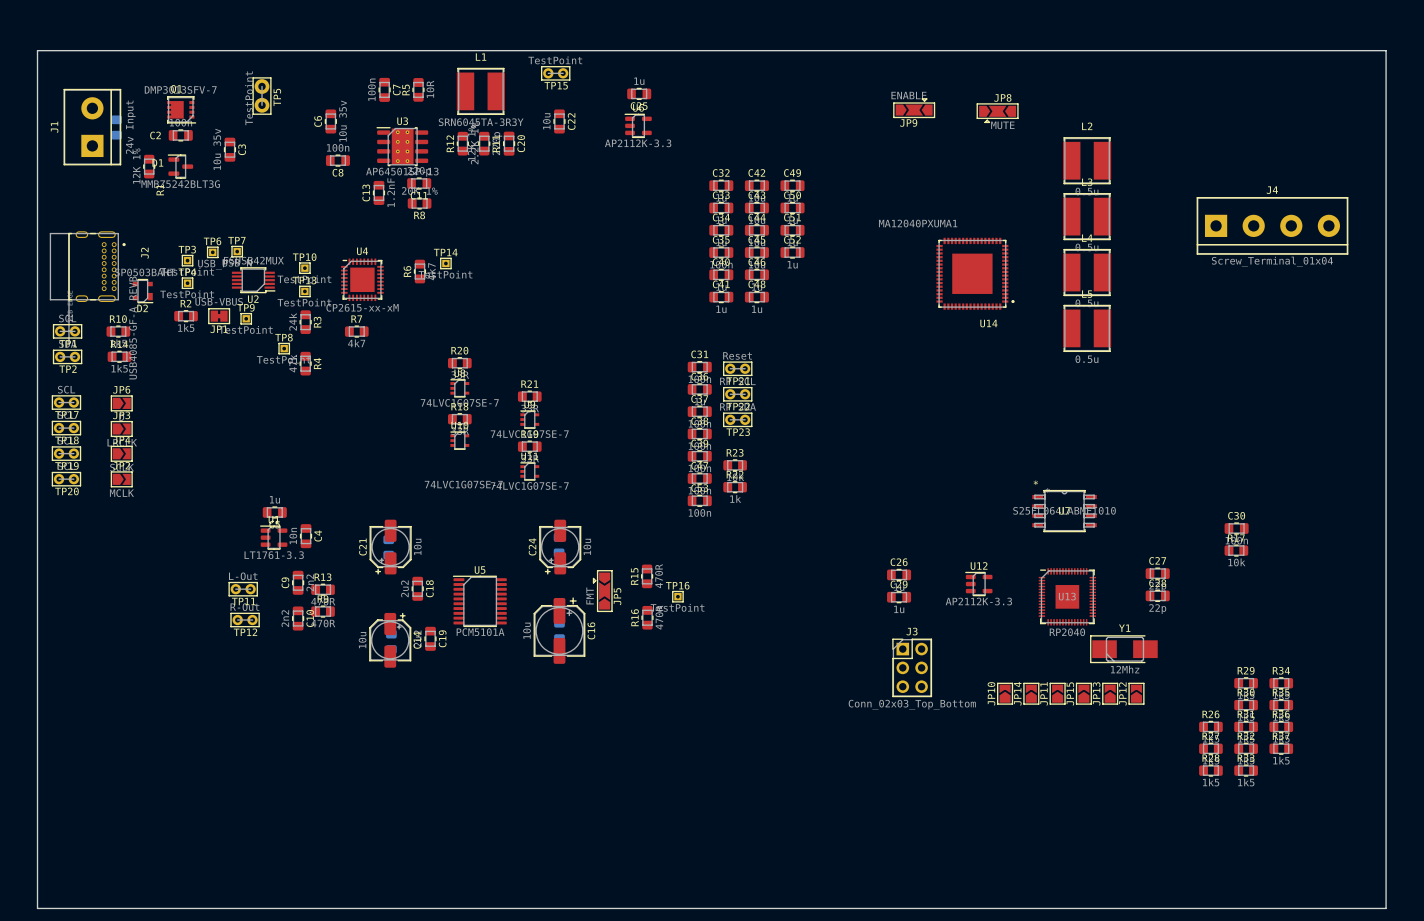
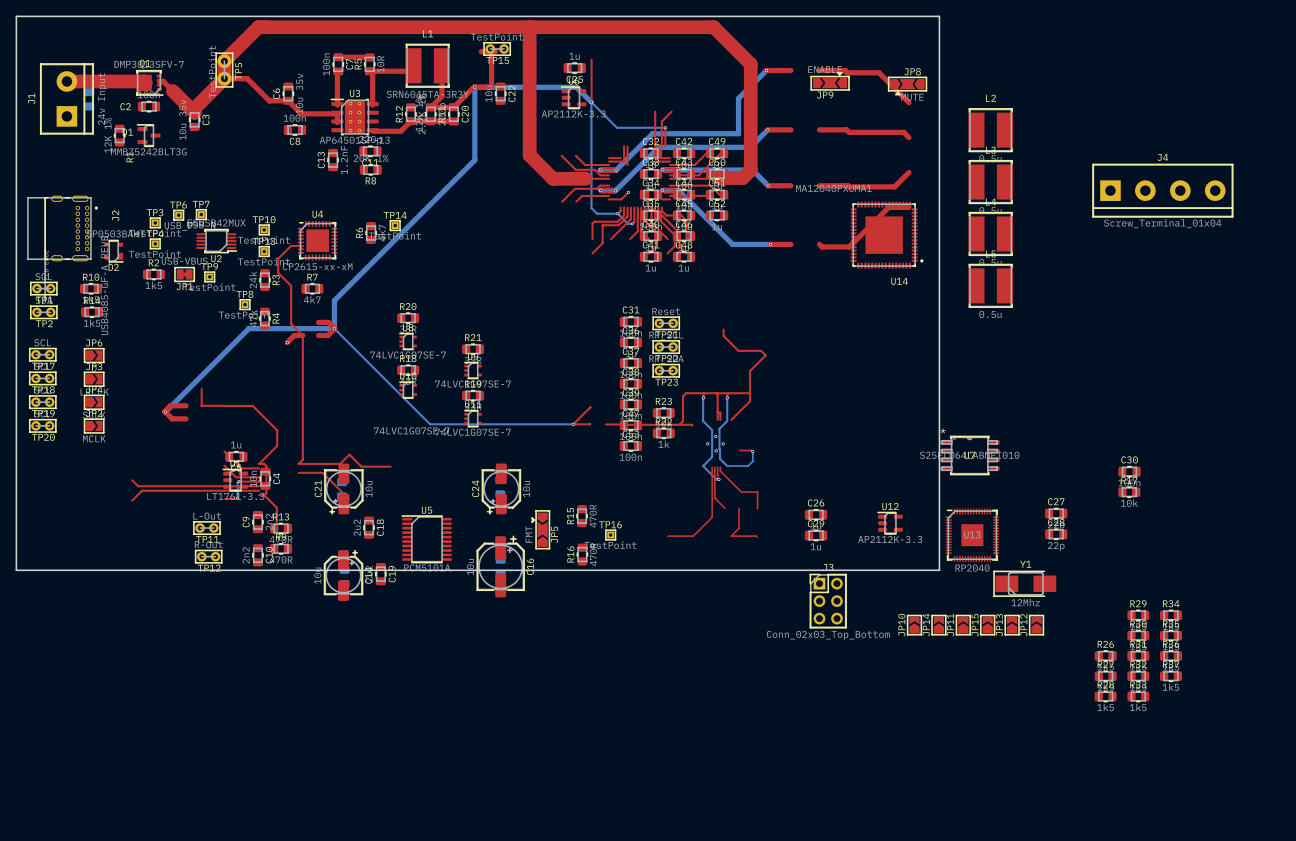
board edge: none -> (16, 16) (939, 16) (939, 570) (16, 570) (16, 16)
top track: none -> (529, 27) (529, 155) (553, 178) (585, 178)
board edge: (37, 50) (1386, 50) (1386, 908) (37, 908) (37, 50) -> none
top track: none -> (481, 51) (494, 51) (491, 55) (491, 87) (473, 87) (453, 107) (430, 107) (441, 96) (441, 65)
top track: none -> (338, 57) (369, 57)
top track: none -> (591, 59) (591, 102)
top track: none -> (413, 65) (407, 71) (369, 71) (372, 74) (372, 105)
top track: none -> (766, 70) (790, 70)
bottom track: none -> (766, 70) (738, 98) (738, 133) (652, 133) (615, 170) (600, 170)
via: none -> (766, 70)
top track: none -> (819, 70) (879, 72) (908, 102)
top track: none -> (338, 71) (337, 105)
top track: none -> (224, 78) (247, 78) (269, 100)
top track: none -> (224, 78) (194, 108) (194, 112) (163, 81) (159, 81)
top track: none -> (224, 78) (224, 61) (258, 27) (713, 27) (750, 64) (750, 170) (742, 178) (718, 178)
top track: none -> (66, 81) (145, 82)
via: none -> (474, 87)
top track: none -> (269, 100) (288, 100) (301, 113) (337, 113) (337, 122)
bottom track: none -> (591, 102) (576, 87) (474, 87) (474, 160) (334, 300) (334, 328)
bottom track: none -> (591, 102) (616, 127) (665, 127)
bottom track: none -> (591, 102) (591, 208) (597, 213) (617, 213) (627, 223) (632, 223)
via: none -> (591, 102)
top track: none -> (655, 111) (655, 146)
top track: none -> (671, 111) (661, 121) (661, 146)
top track: none -> (453, 121) (410, 121) (400, 131) (372, 131)
top track: none -> (665, 127) (665, 146)
via: none -> (665, 127)
top track: none -> (767, 129) (790, 129)
bottom track: none -> (767, 129) (750, 147) (658, 147) (615, 190) (600, 190)
via: none -> (767, 129)
top track: none -> (819, 129) (846, 129) (849, 132) (903, 132) (908, 137)
top track: none -> (624, 146) (624, 161) (609, 161)
top track: none -> (627, 146) (627, 165)
top track: none -> (658, 146) (658, 158) (670, 158)
top track: none -> (707, 152) (694, 165) (670, 165)
top track: none -> (721, 152) (698, 175) (670, 175)
top track: none -> (561, 155) (575, 169) (594, 169) (600, 175) (609, 175)
top track: none -> (575, 155) (585, 165) (609, 165)
top track: none -> (609, 158) (620, 158)
top track: none -> (655, 161) (670, 161)
via: none -> (654, 163)
top track: none -> (601, 168) (615, 168) (616, 170) (614, 171) (601, 171) (599, 170) (601, 168)
top track: none -> (663, 168) (677, 168) (678, 170) (676, 171) (664, 171) (662, 169) (663, 168)
via: none -> (600, 170)
bottom track: none -> (662, 169) (752, 170) (768, 185)
via: none -> (662, 169)
via: none -> (615, 170)
top track: none -> (908, 172) (894, 186) (819, 185)
top track: none -> (585, 178) (609, 178)
top track: none -> (670, 178) (717, 178)
top track: none -> (609, 185) (600, 185) (596, 188) (575, 188) (562, 201)
top track: none -> (648, 185) (648, 207)
top track: none -> (670, 185) (710, 185) (721, 196)
top track: none -> (768, 185) (790, 185)
via: none -> (768, 185)
top track: none -> (601, 189) (600, 190) (602, 192) (614, 192) (615, 190) (601, 189)
top track: none -> (663, 189) (677, 189) (679, 190) (677, 192) (664, 192) (662, 190) (663, 189)
via: none -> (600, 190)
via: none -> (615, 190)
bottom track: none -> (662, 190) (678, 190) (732, 244) (770, 244)
via: none -> (662, 190)
top track: none -> (628, 192) (621, 199) (609, 199)
via: none -> (628, 192)
top track: none -> (609, 195) (582, 195) (576, 201)
top track: none -> (670, 195) (707, 196)
top track: none -> (661, 199) (670, 199)
top track: none -> (908, 207) (888, 207) (849, 246) (822, 246) (819, 244)
top track: none -> (620, 207) (617, 213)
top track: none -> (624, 207) (624, 215) (617, 221) (594, 221) (592, 223) (592, 239)
top track: none -> (627, 207) (627, 216) (618, 225) (602, 225) (602, 243) (592, 253)
top track: none -> (630, 207) (630, 219) (611, 239)
top track: none -> (634, 207) (634, 221) (632, 223)
top track: none -> (637, 207) (637, 231) (630, 239)
top track: none -> (641, 207) (641, 231) (648, 239)
top track: none -> (644, 207) (644, 220) (655, 231) (655, 246) (648, 253)
top track: none -> (651, 207) (651, 222) (667, 239)
top track: none -> (655, 207) (655, 215) (674, 235) (674, 246) (667, 253)
top track: none -> (658, 207) (658, 211) (679, 232) (679, 246) (686, 253)
top track: none -> (661, 207) (661, 210) (666, 215) (681, 215) (686, 220) (686, 239)
via: none -> (617, 213)
via: none -> (632, 223)
top track: none -> (770, 244) (790, 244)
via: none -> (770, 244)
top track: none -> (300, 249) (300, 245) (291, 245) (278, 258) (278, 272) (291, 285) (291, 323) (302, 335) (294, 335) (287, 342)
top track: none -> (318, 322) (328, 322) (334, 328) (327, 335) (318, 335)
bottom track: none -> (334, 328) (248, 328) (165, 412)
bottom track: none -> (334, 328) (430, 424) (573, 424)
via: none -> (334, 328)
top track: none -> (723, 329) (723, 335) (738, 350) (761, 350) (765, 355) (750, 371) (750, 401) (731, 419)
top track: none -> (302, 335) (302, 459) (298, 463) (340, 463) (349, 454) (361, 466) (390, 466)
via: none -> (287, 342)
top track: none -> (201, 388) (201, 405) (252, 405) (277, 430) (277, 445) (259, 463) (266, 466) (266, 493) (264, 495)
top track: none -> (703, 393) (703, 397)
top track: none -> (716, 393) (717, 419)
top track: none -> (728, 393) (727, 397)
top track: none -> (750, 393) (686, 393) (682, 396) (682, 421) (679, 424)
bottom track: none -> (703, 397) (703, 421) (712, 430) (712, 457) (703, 466) (716, 479) (718, 479)
via: none -> (703, 397)
bottom track: none -> (727, 397) (727, 421) (719, 428) (720, 458) (727, 466) (748, 466) (752, 461) (752, 451)
via: none -> (727, 397)
top track: none -> (186, 405) (170, 405) (164, 411) (172, 418) (186, 418)
top track: none -> (590, 407) (573, 424) (590, 424)
via: none -> (165, 412)
top track: none -> (717, 412) (720, 412) (720, 419)
via: none -> (573, 424)
top track: none -> (605, 424) (692, 425)
via: none -> (715, 436)
via: none -> (707, 443)
via: none -> (723, 443)
top track: none -> (739, 450) (752, 451)
top track: none -> (224, 451) (241, 468) (259, 468)
via: none -> (716, 450)
via: none -> (752, 451)
top track: none -> (224, 465) (236, 477) (259, 477)
top track: none -> (712, 467) (712, 517) (693, 536) (668, 536)
top track: none -> (714, 467) (714, 498) (725, 508)
top track: none -> (717, 467) (718, 479)
top track: none -> (720, 467) (720, 471) (741, 492) (757, 492) (757, 508)
top track: none -> (298, 472) (322, 472) (348, 498)
via: none -> (718, 479)
top track: none -> (132, 480) (138, 486) (259, 486)
top track: none -> (238, 481) (259, 481)
bottom track: none -> (238, 481) (237, 498)
via: none -> (238, 481)
top track: none -> (259, 490) (142, 490) (132, 500)
top track: none -> (259, 495) (264, 495)
top track: none -> (264, 495) (276, 507) (276, 531)
top track: none -> (237, 498) (225, 498)
via: none -> (237, 498)
top track: none -> (738, 508) (738, 528) (731, 536) (756, 537)

